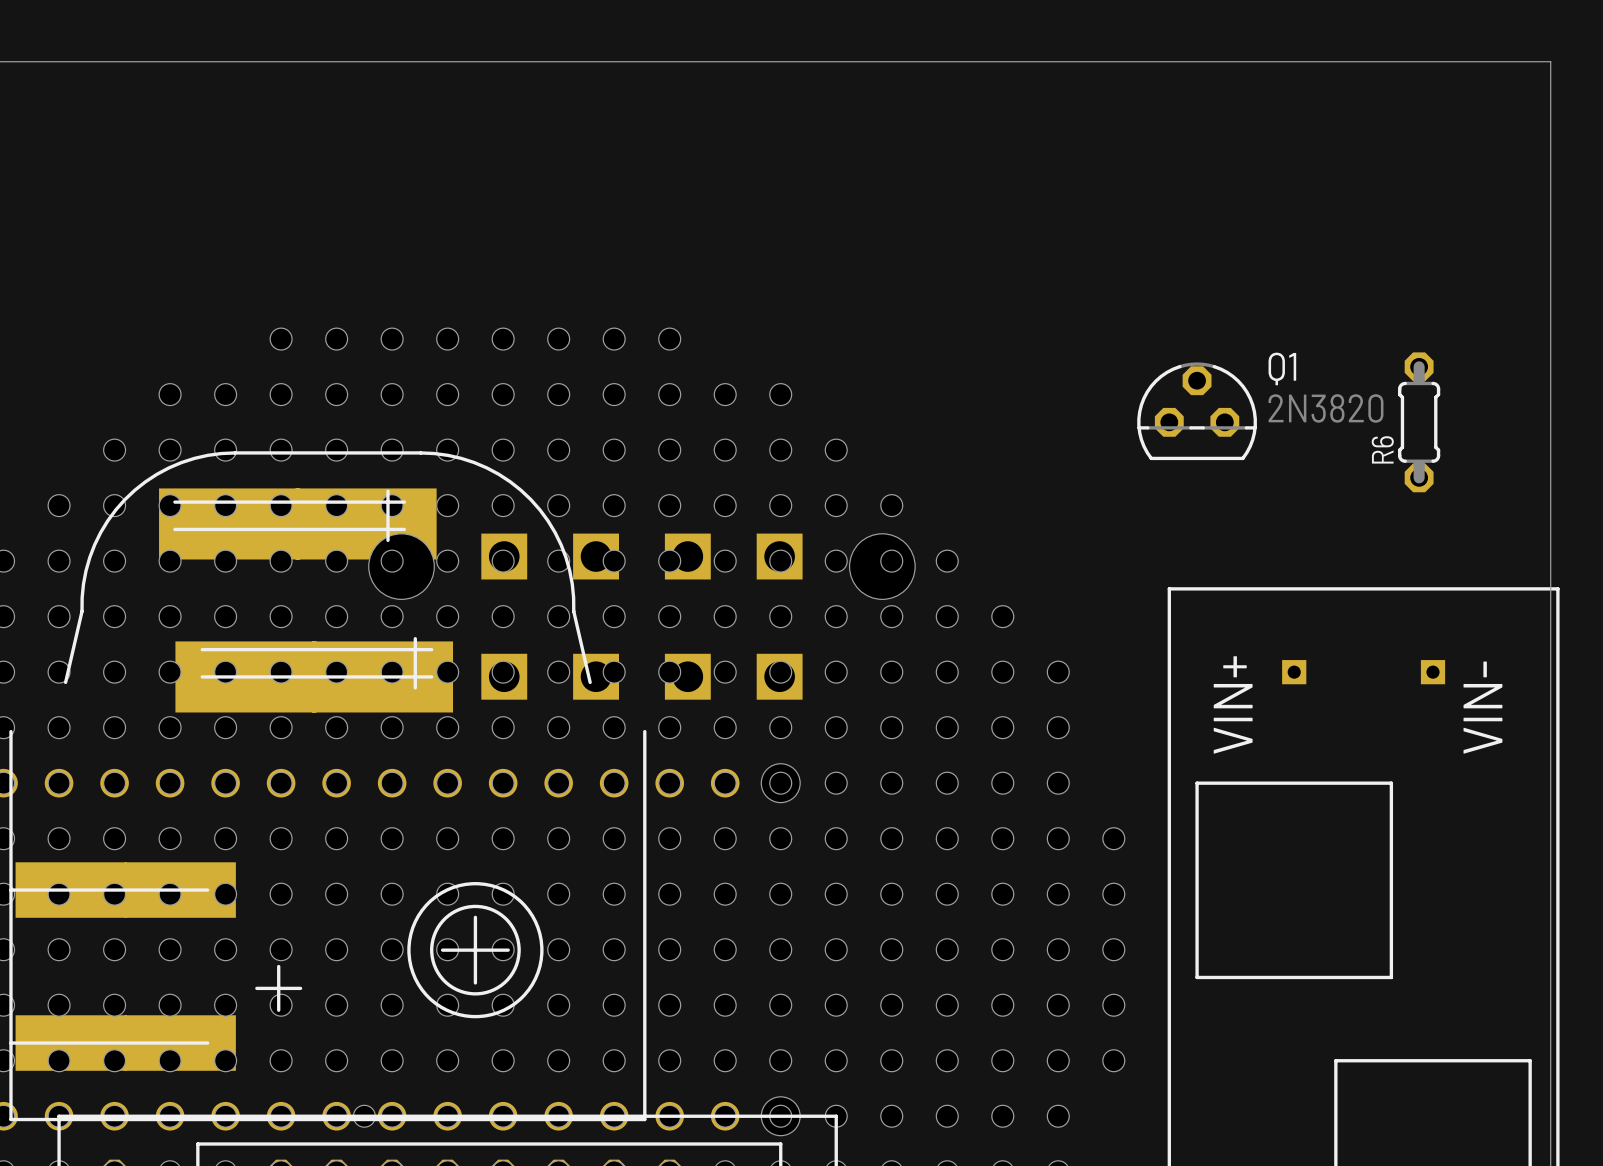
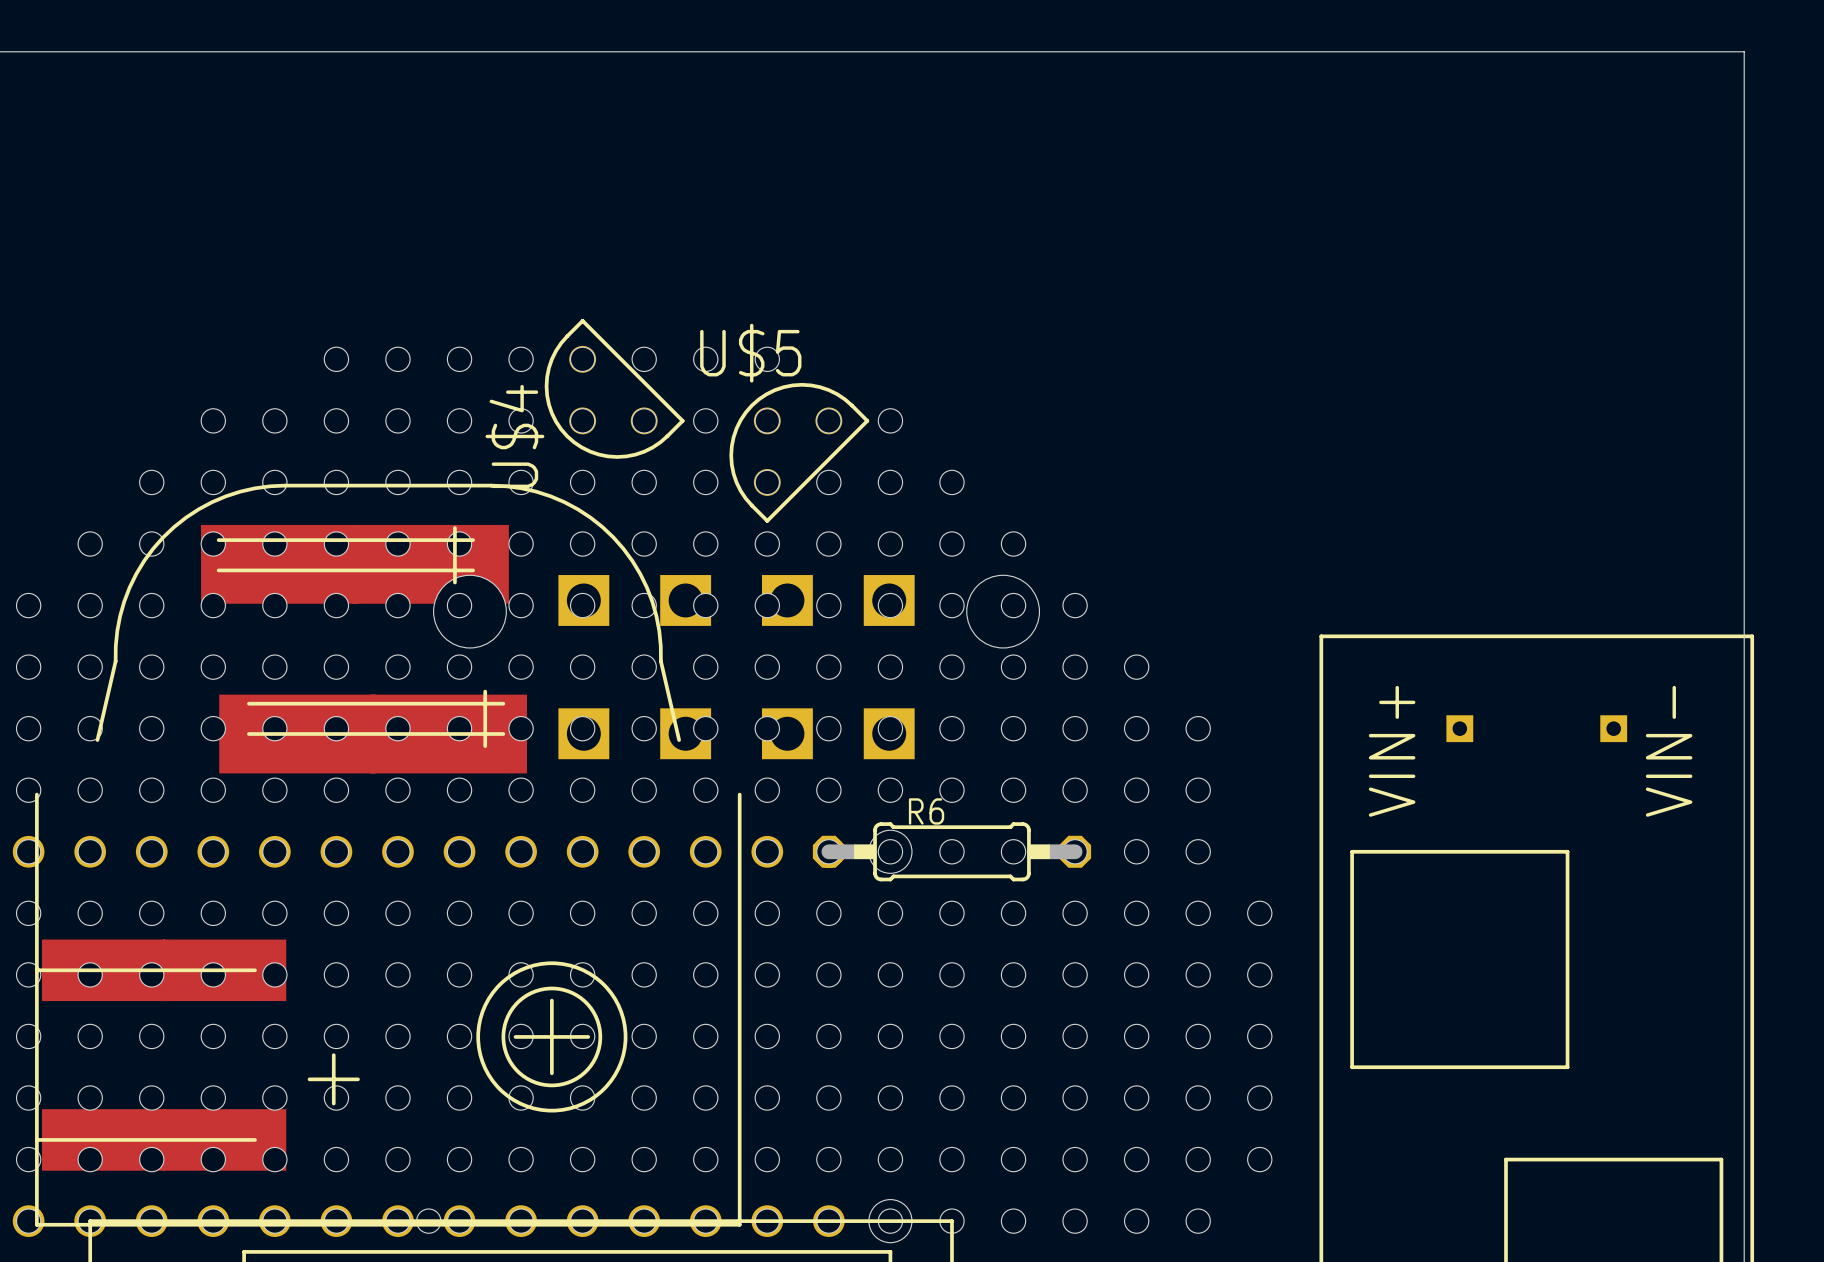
R6 footprint: [1398, 352, 1441, 493] -> [812, 822, 1092, 882]
U$4: none -> (614, 388)
Q1: 2N3820 (1197, 411) -> none
U$5: none -> (799, 452)
R6 name position: R6 (1382, 449) -> R6 (926, 811)

